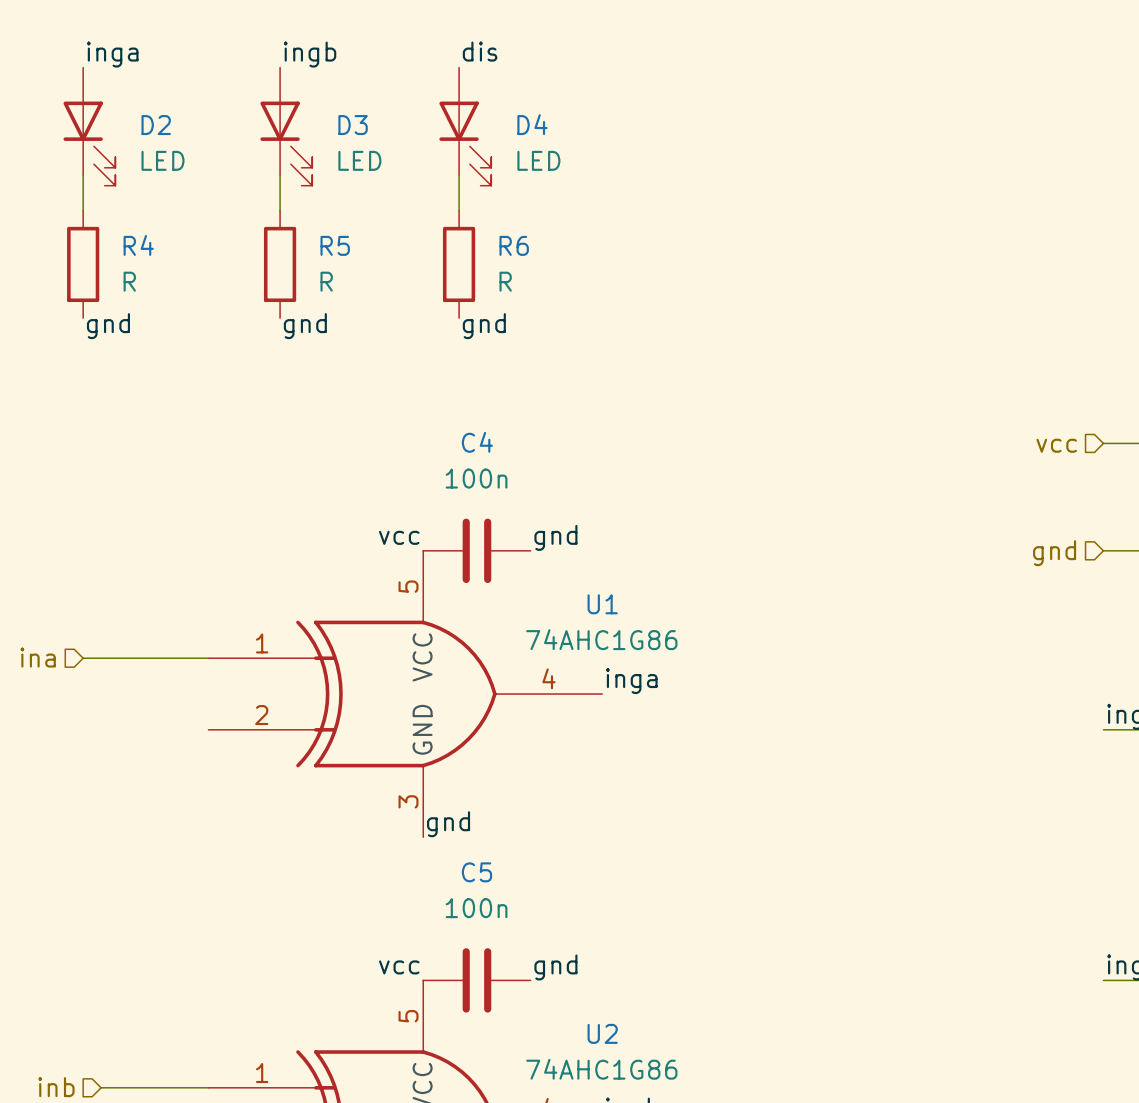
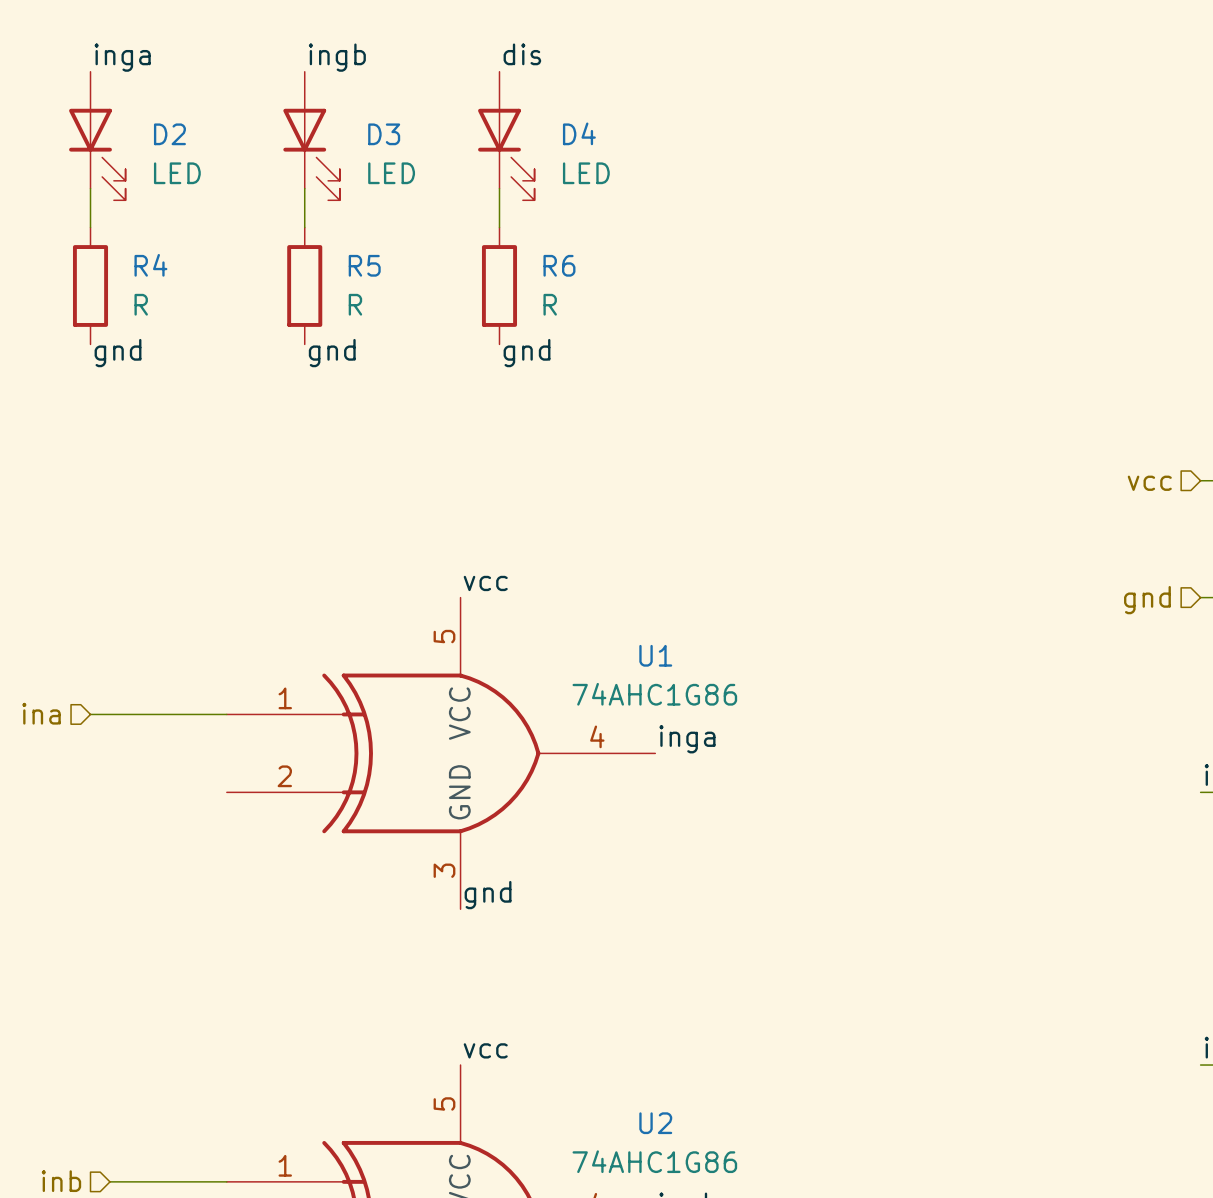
label position: vcc (399, 537) -> vcc (485, 583)
label: gnd (555, 537) -> none
C4: 100n (476, 550) -> none
label position: vcc (399, 967) -> vcc (485, 1050)
label: gnd (555, 967) -> none
C5: 100n (476, 980) -> none

